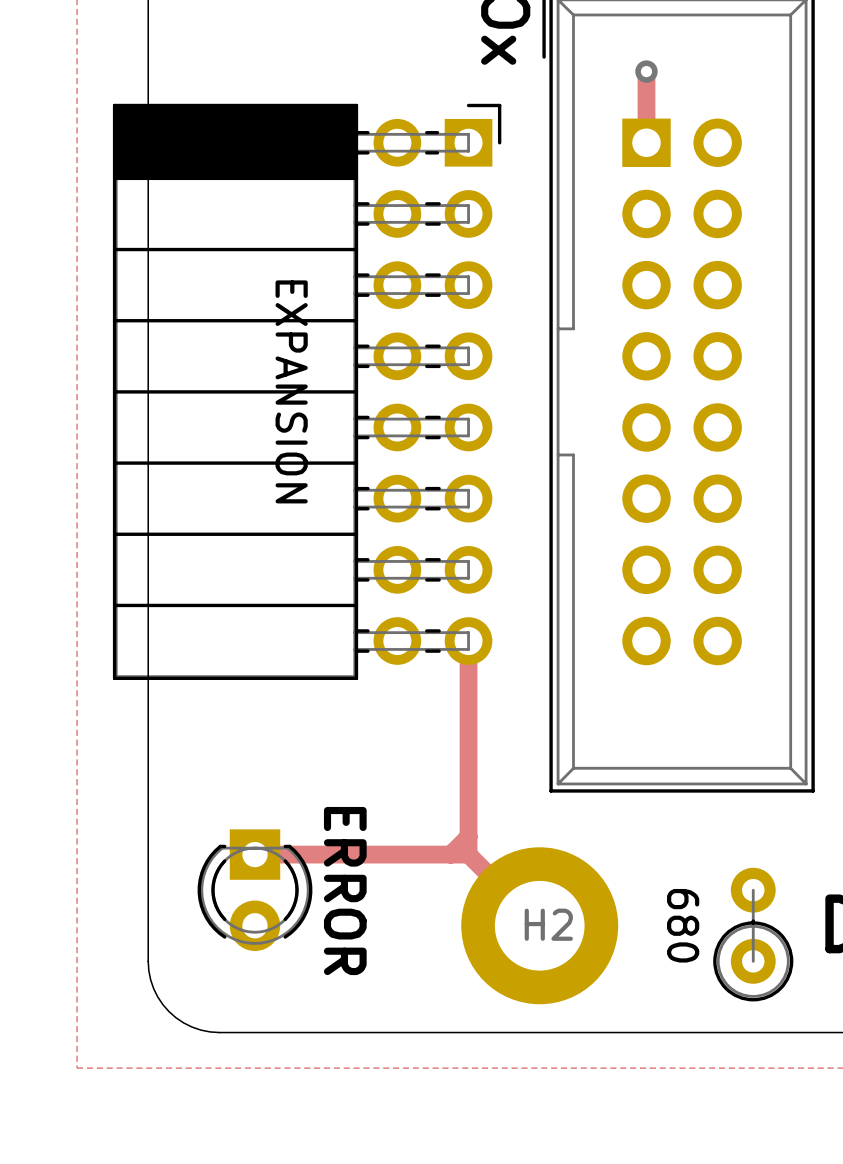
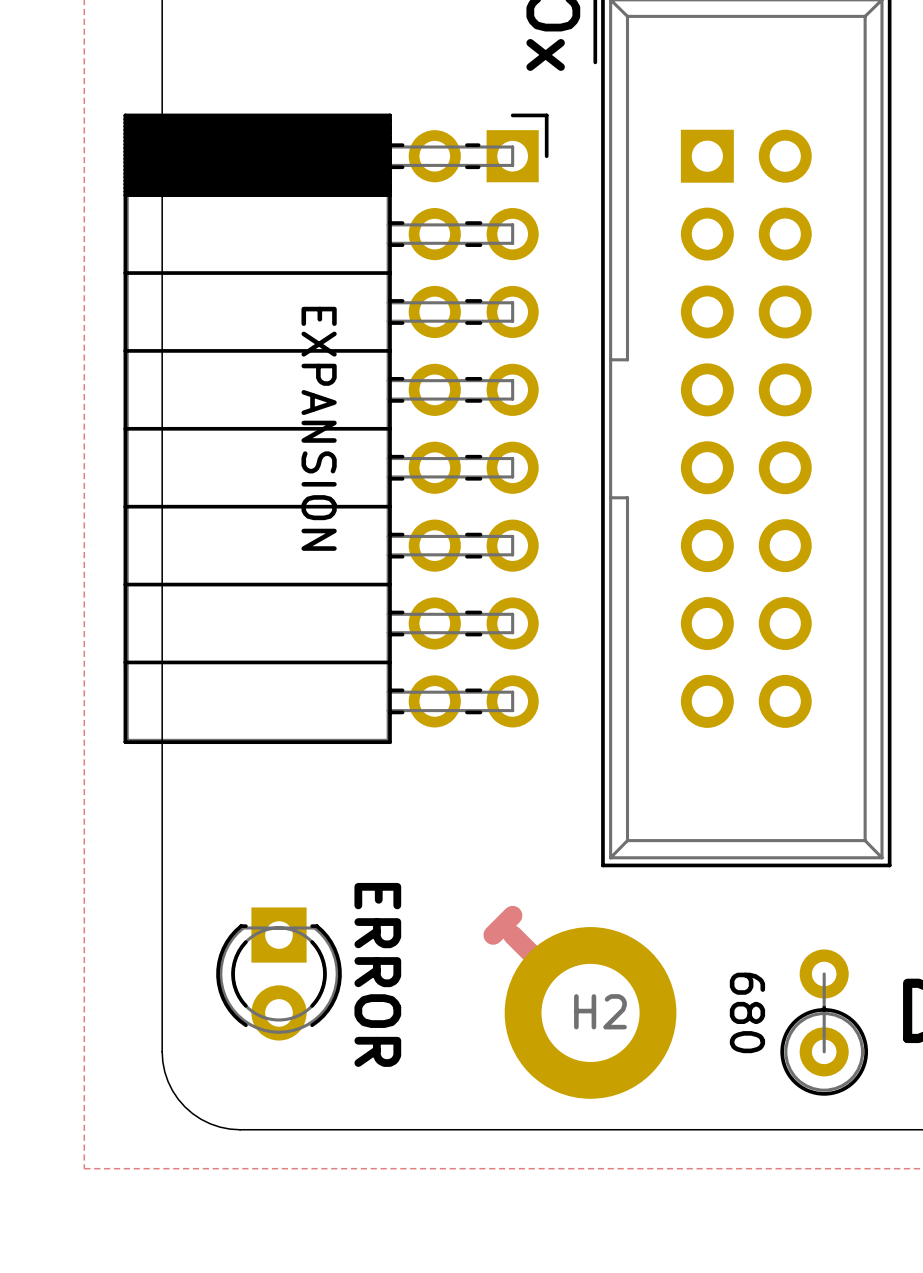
track: (646, 71) (646, 142) -> none
via: (646, 71) -> none
track: (468, 641) (468, 854) (254, 854) -> none

